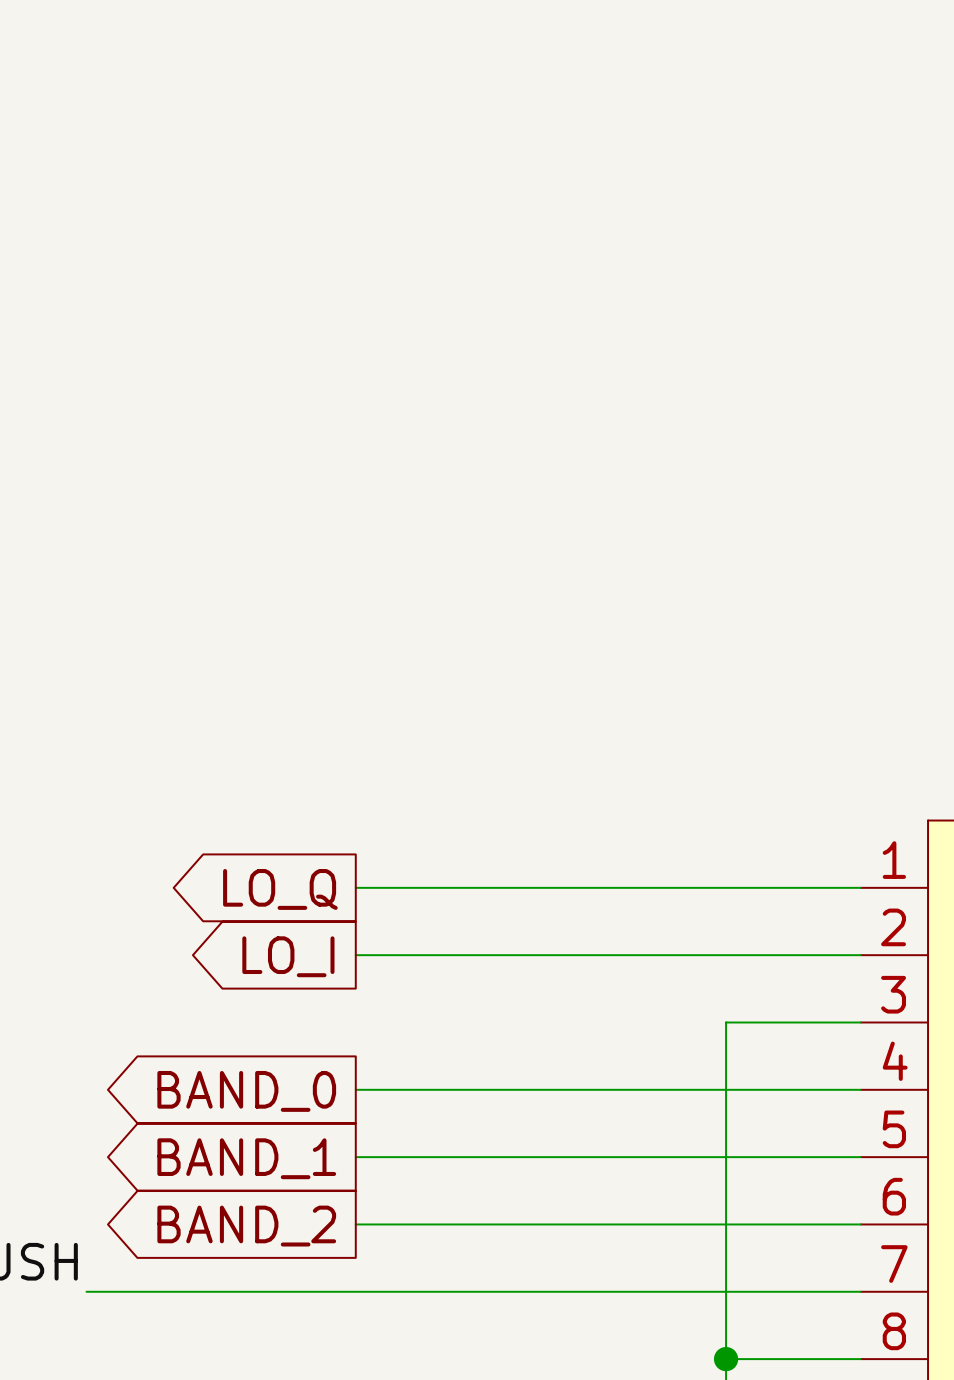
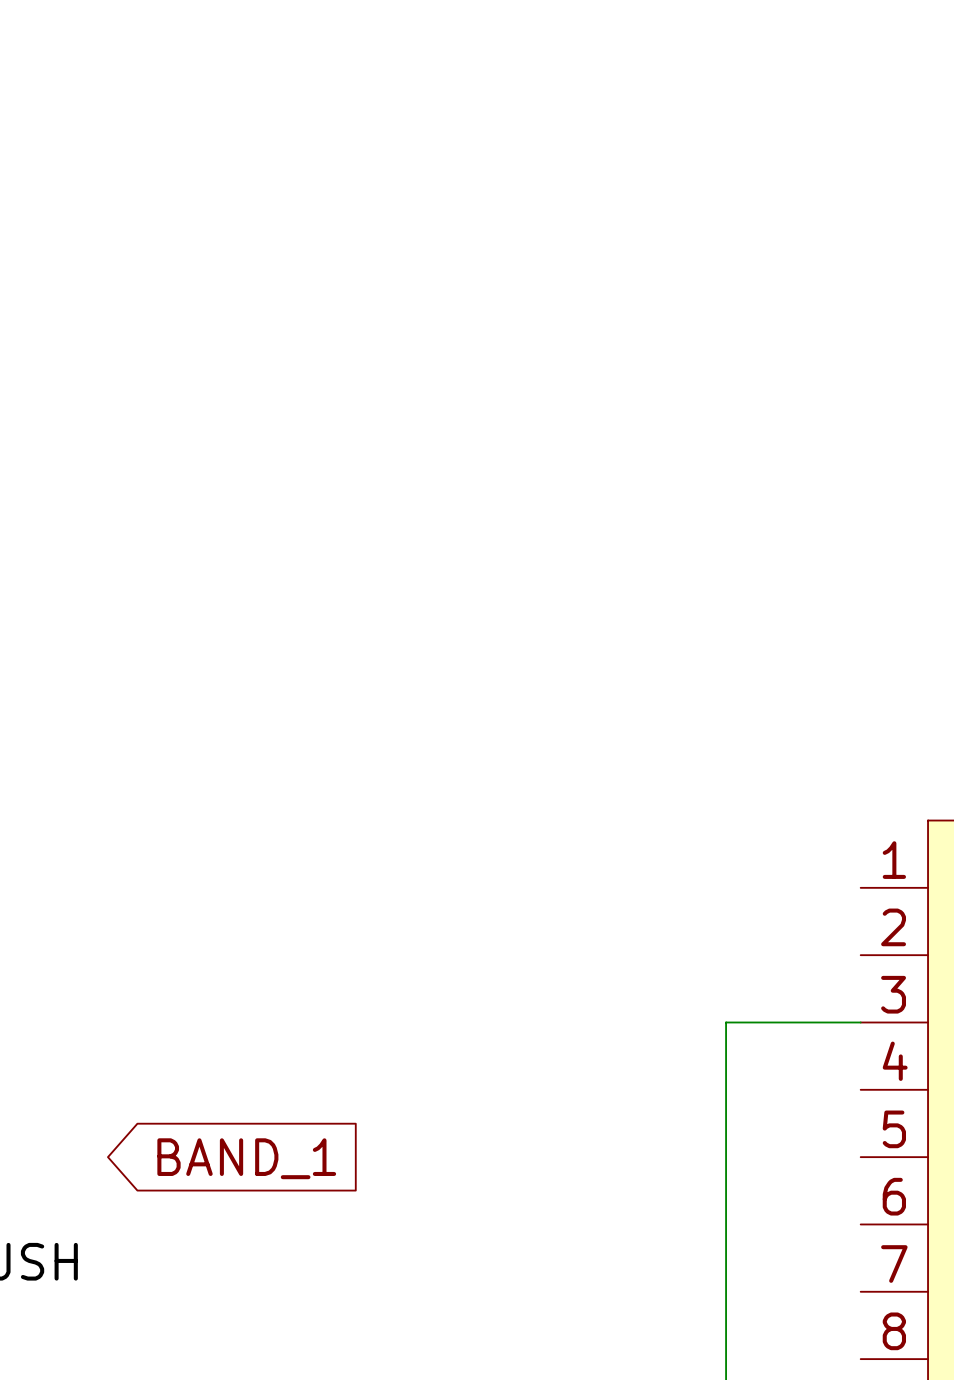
wire: (355, 887) (860, 887) -> none
global label: LO_Q (280, 889) -> none
wire: (355, 955) (860, 955) -> none
global label: LO_I (288, 956) -> none
wire: (355, 1089) (860, 1089) -> none
global label: BAND_0 (246, 1091) -> none
wire: (355, 1157) (860, 1157) -> none
wire: (355, 1224) (860, 1224) -> none
global label: BAND_2 (246, 1226) -> none
wire: (86, 1291) (860, 1291) -> none
wire: (726, 1359) (860, 1359) -> none
junction: (726, 1359) -> none

